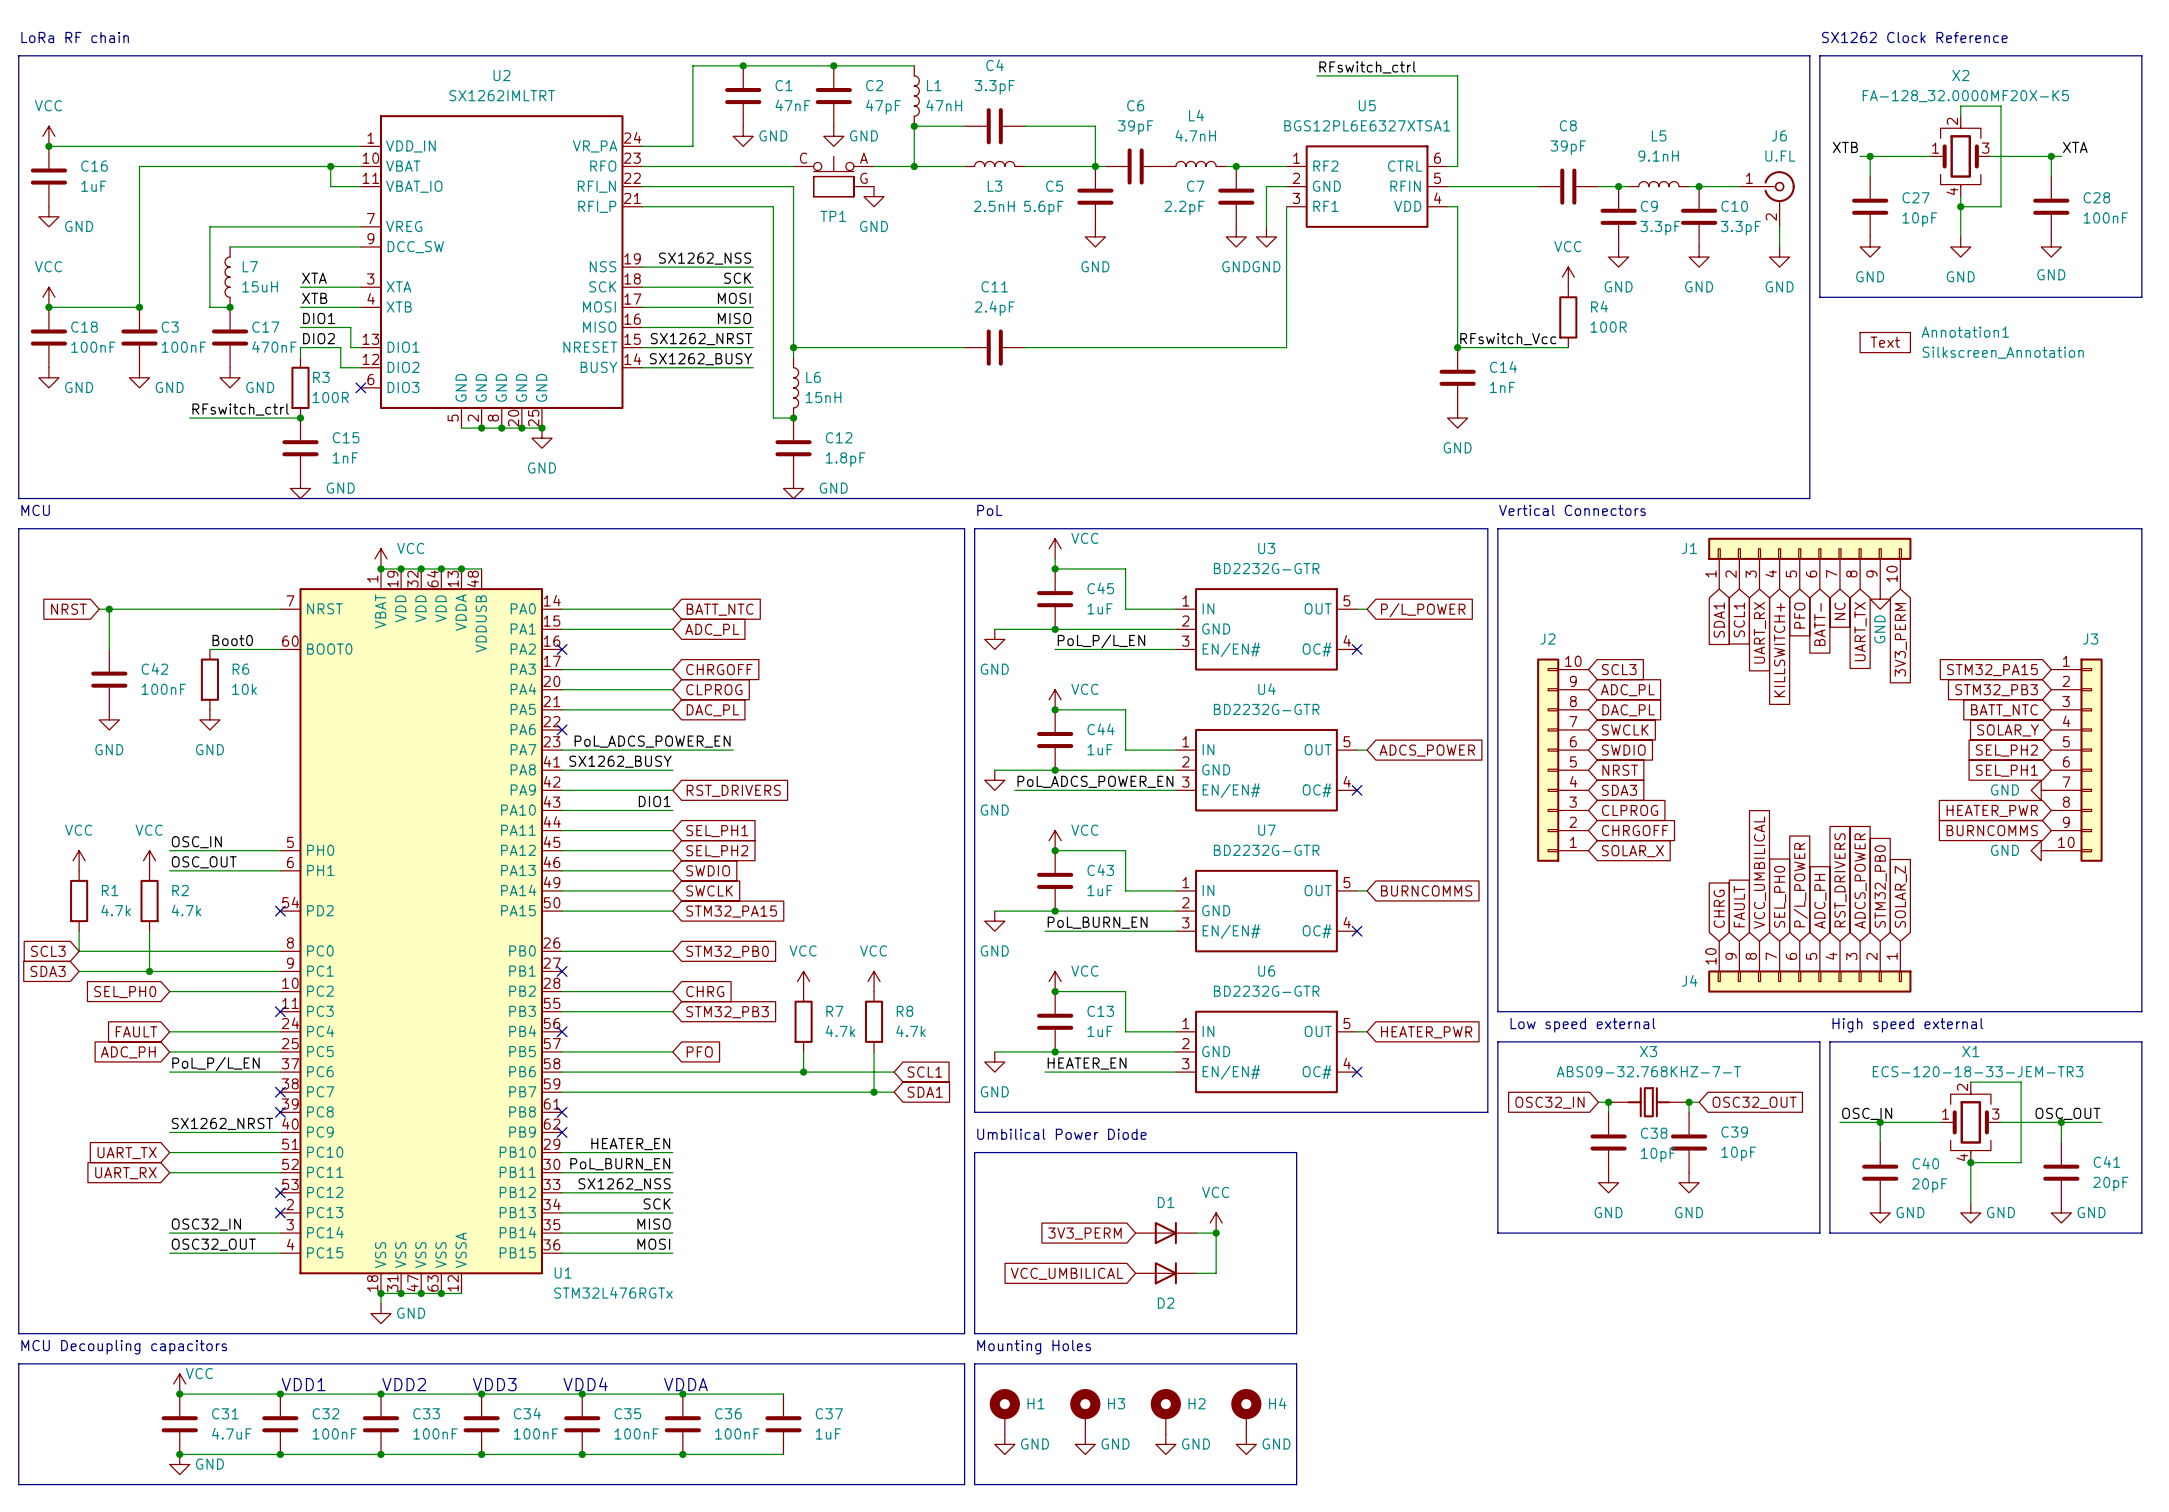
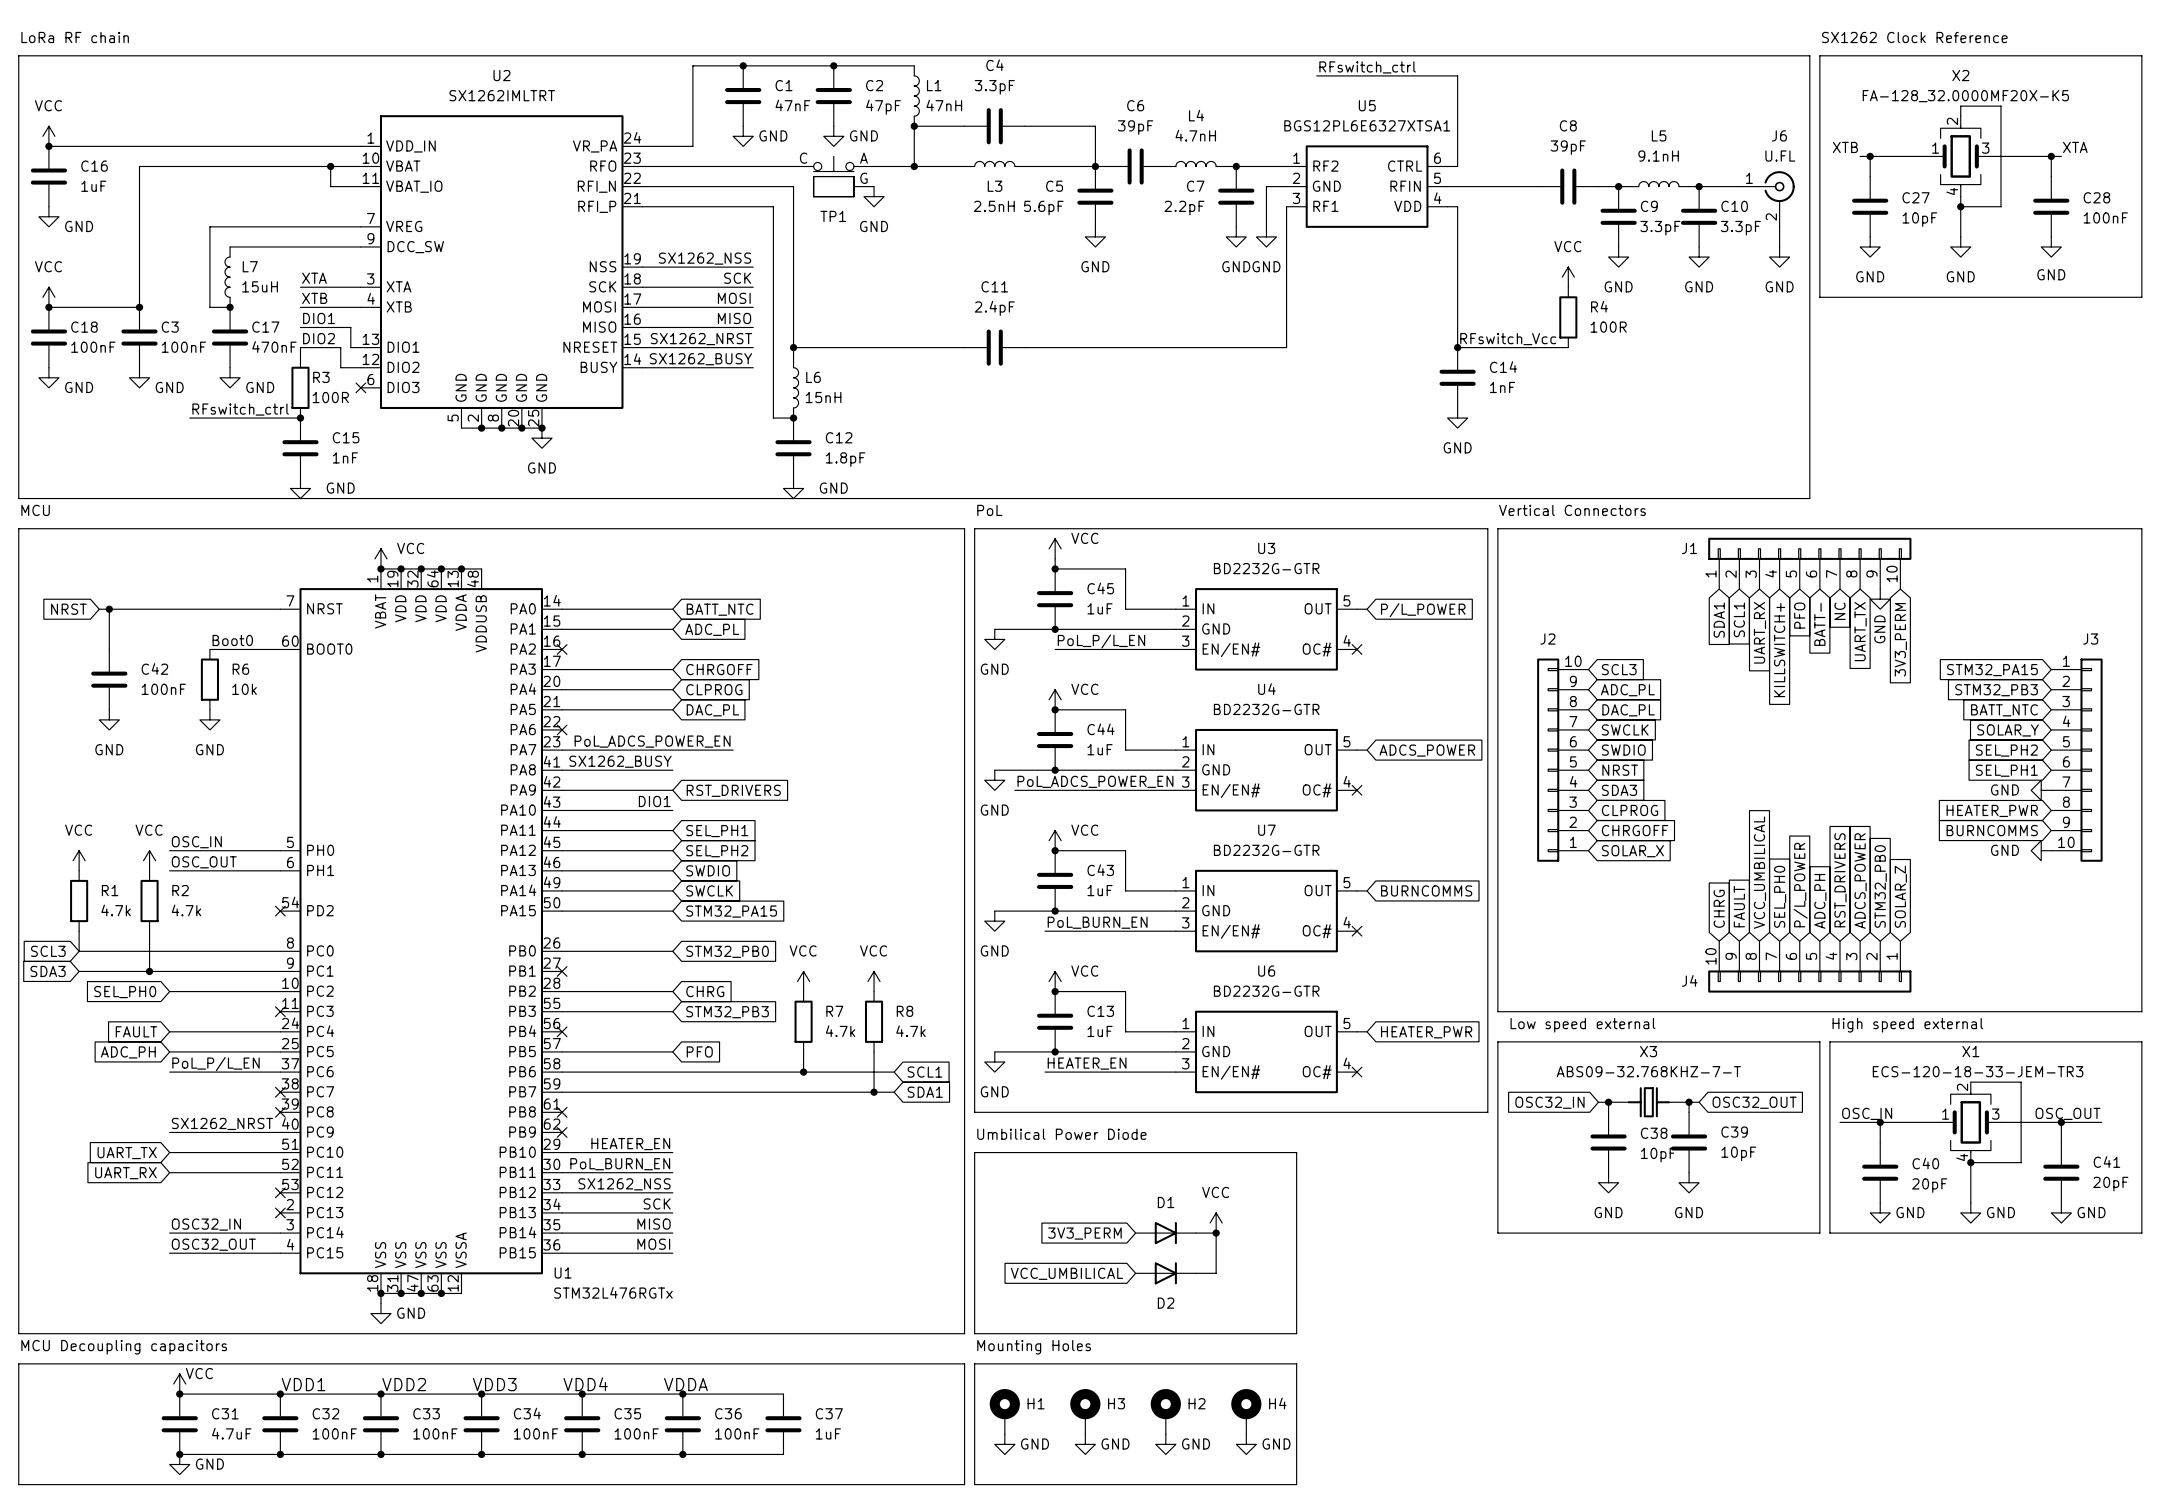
Annotation1: Silkscreen_Annotation (1885, 342) -> none

